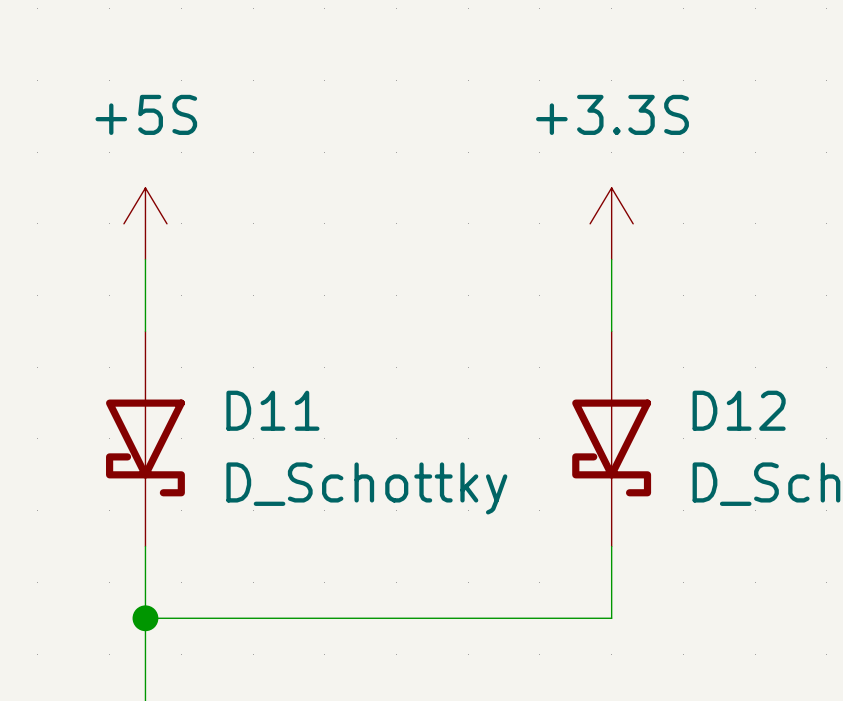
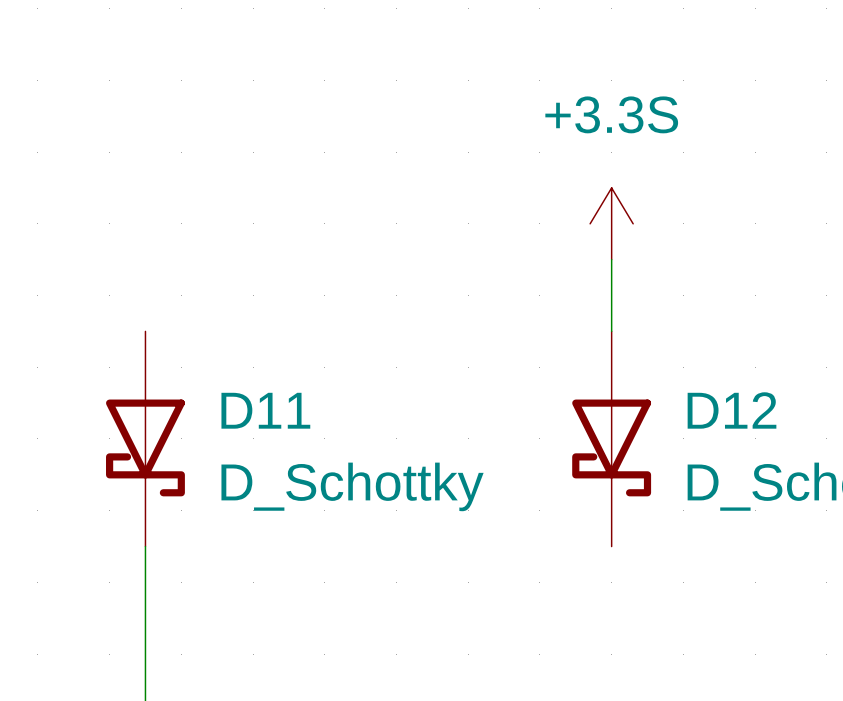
power symbol: +5S (145, 223) -> none
wire: (145, 259) (145, 331) -> none
wire: (611, 546) (611, 618) (145, 618) -> none
junction: (145, 618) -> none

